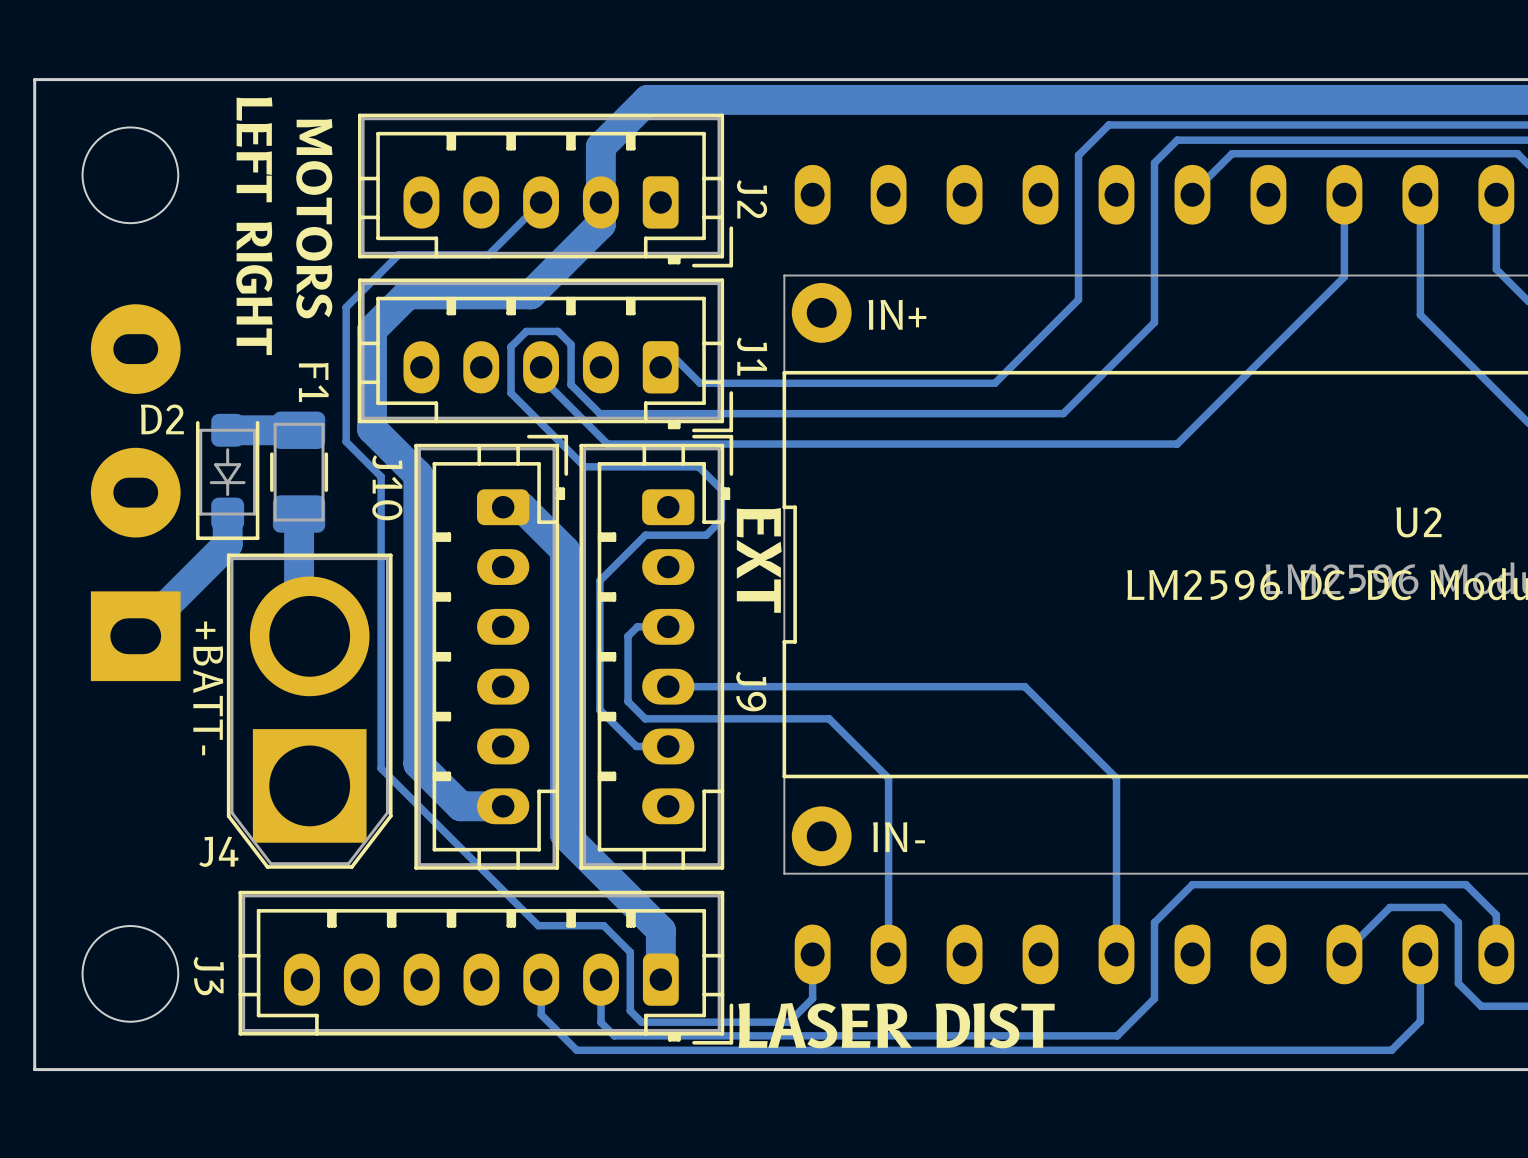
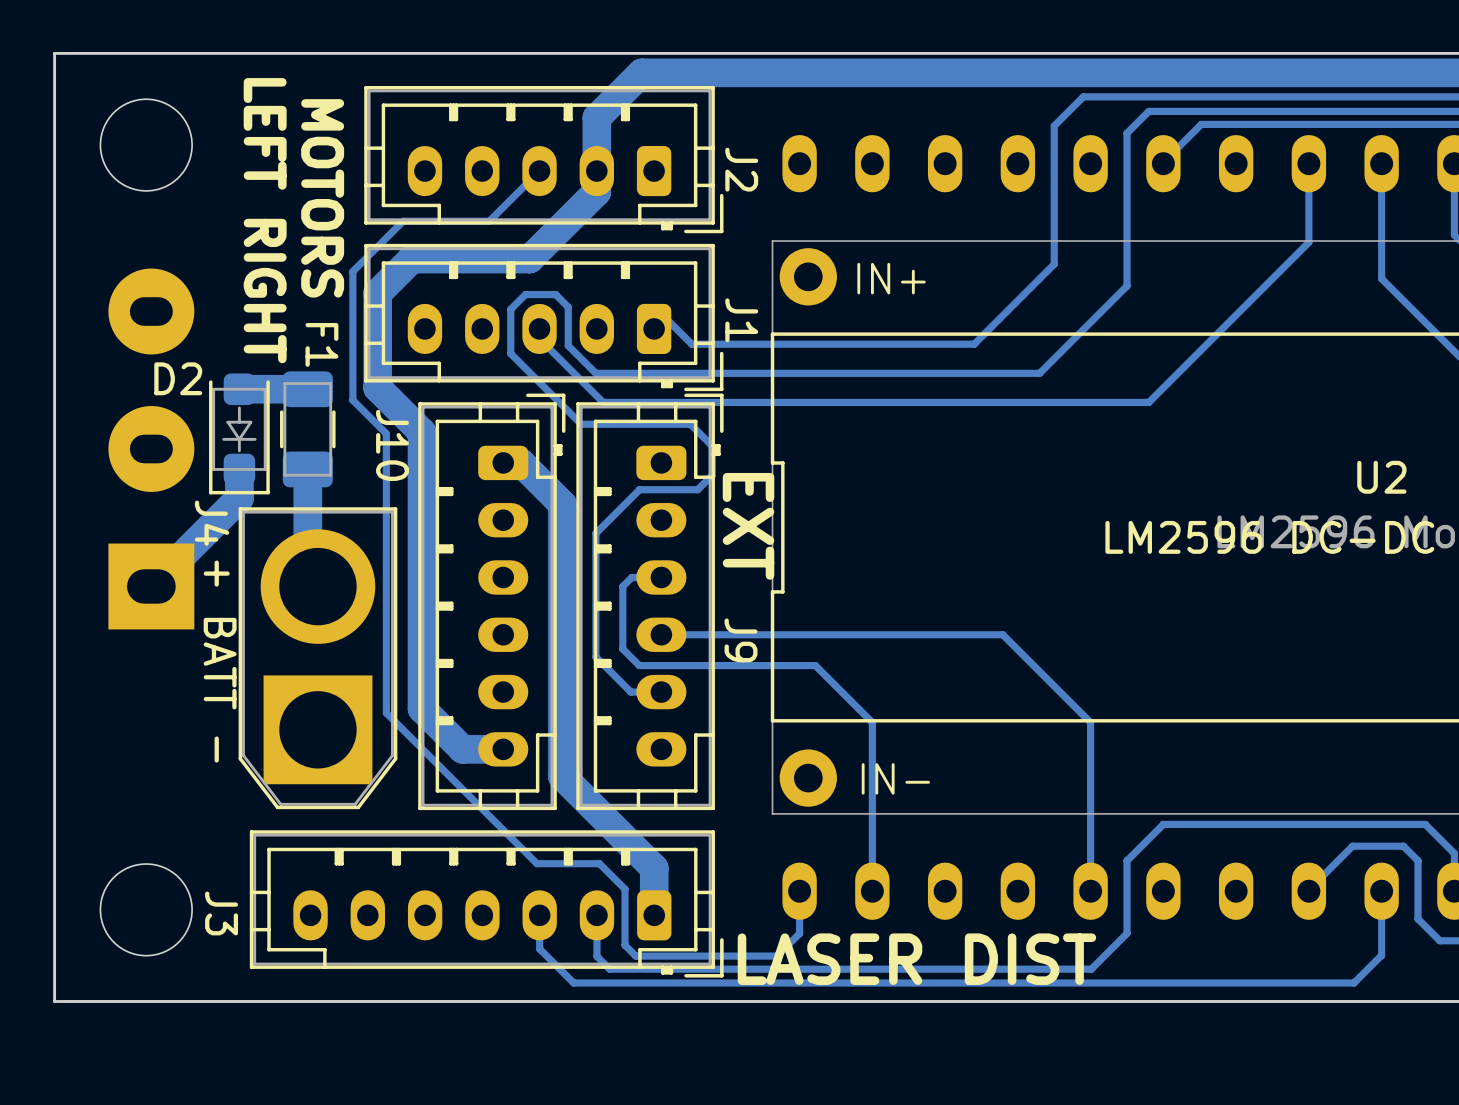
text: +BATT- (208, 688) -> + BATT - (220, 661)
J4 name rotation: 0° (218, 851) -> 90° clockwise (212, 523)
J4 name position: J4 (218, 851) -> J4 (212, 523)

